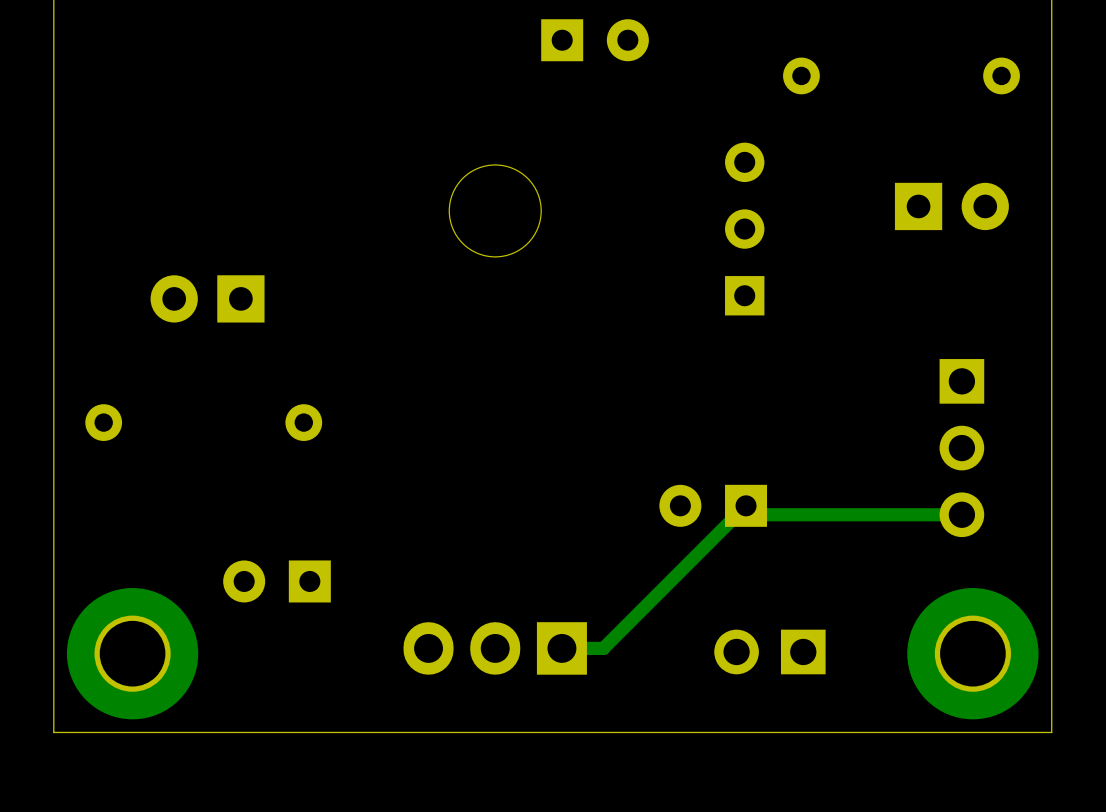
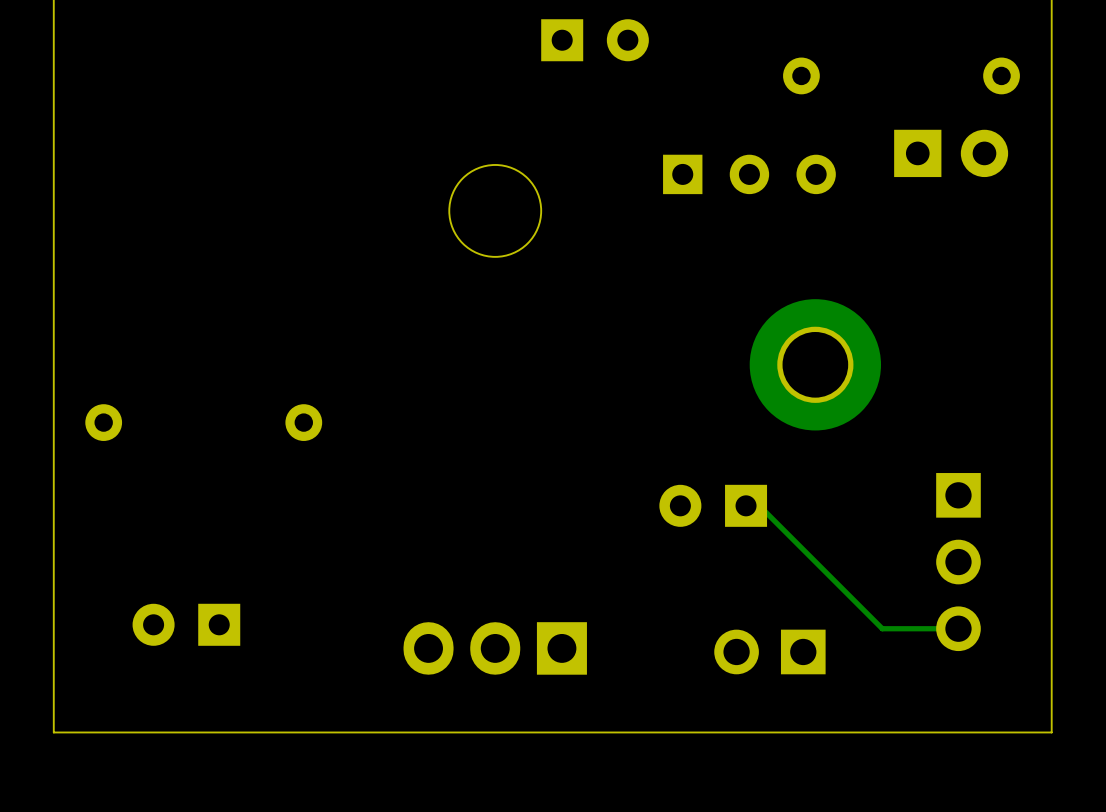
part position: (951, 206) -> (951, 153)
part rotation: 0° (744, 229) -> 90° clockwise (749, 174)
part: (207, 298) -> none
part position: (961, 448) -> (958, 562)
track: none -> (752, 498) (882, 628) (958, 628)
track: (961, 514) (754, 514) (746, 505) (603, 648) (561, 648) -> none
part position: (277, 581) -> (186, 624)
part: (132, 653) -> none
part position: (972, 653) -> (815, 364)

